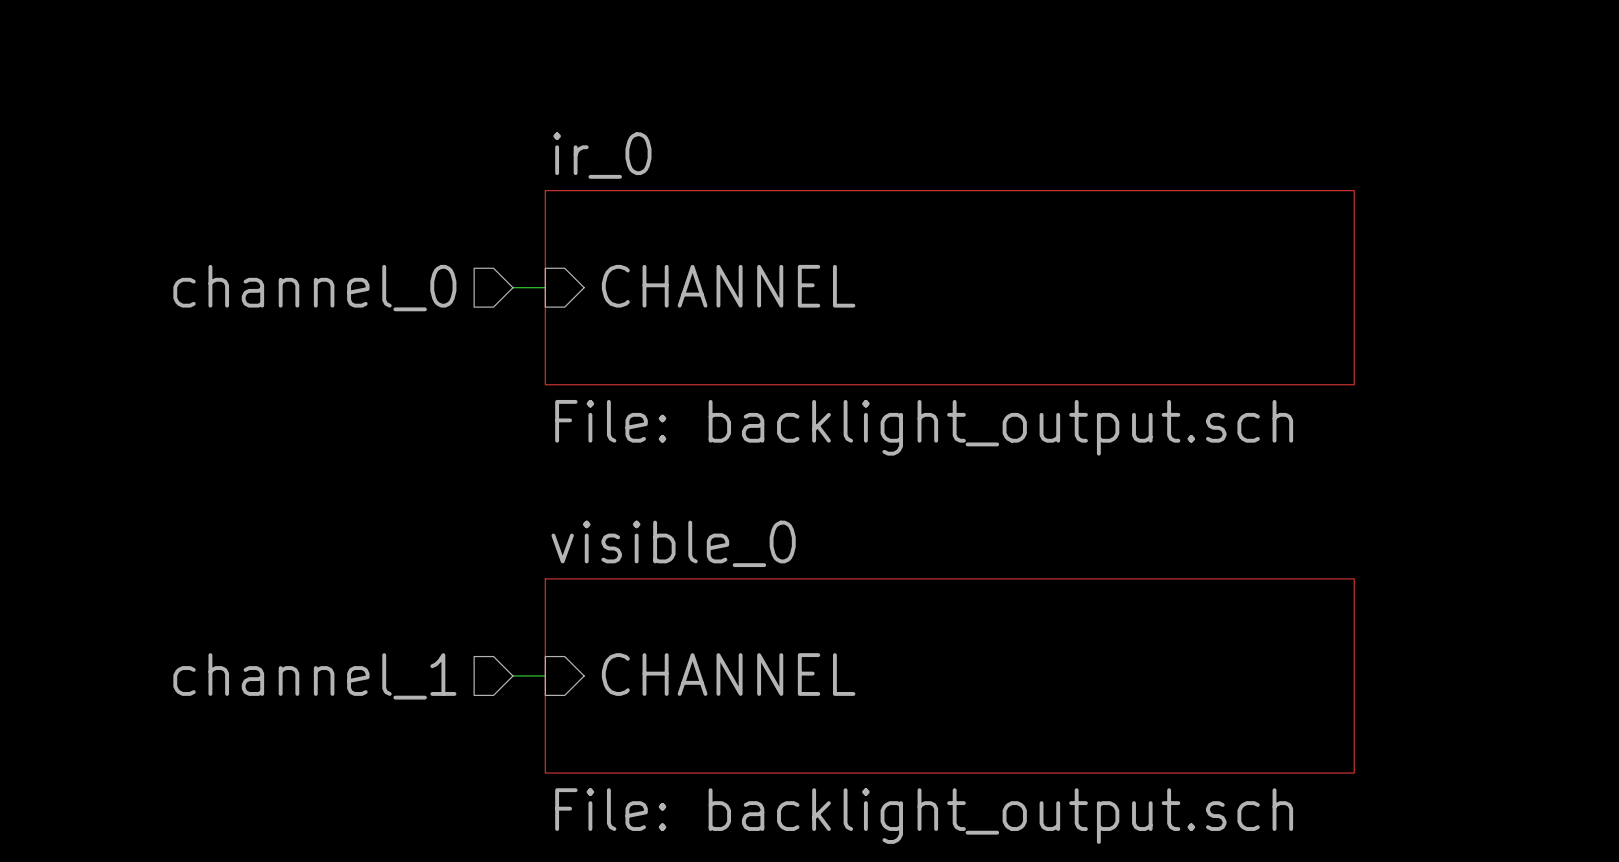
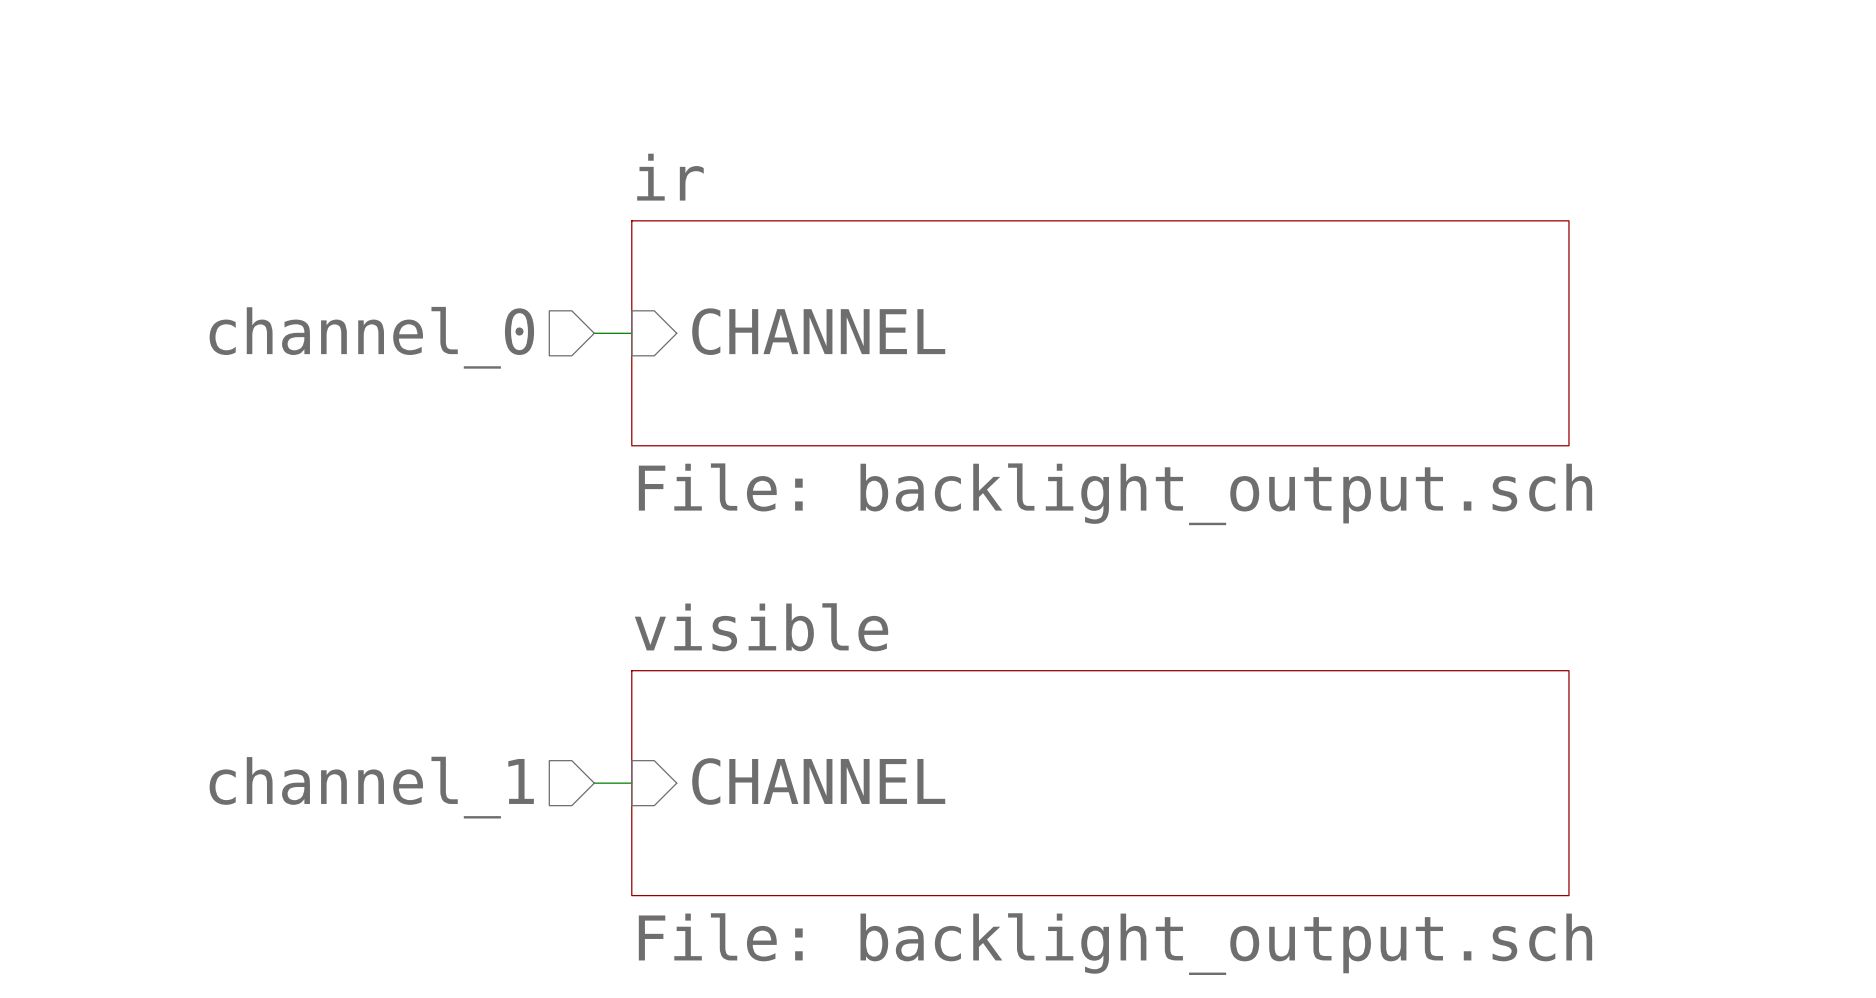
sheet ir_0 name: ir_0 (602, 155) -> ir (670, 177)
sheet visible_0 name: visible_0 (673, 543) -> visible (761, 627)

